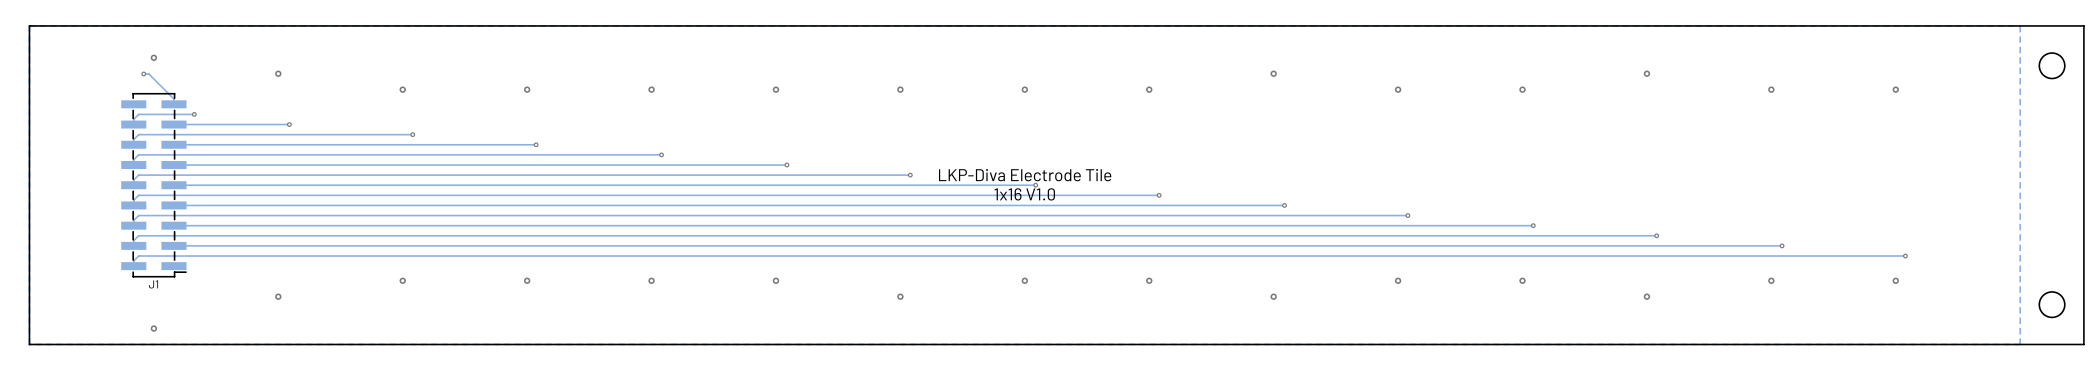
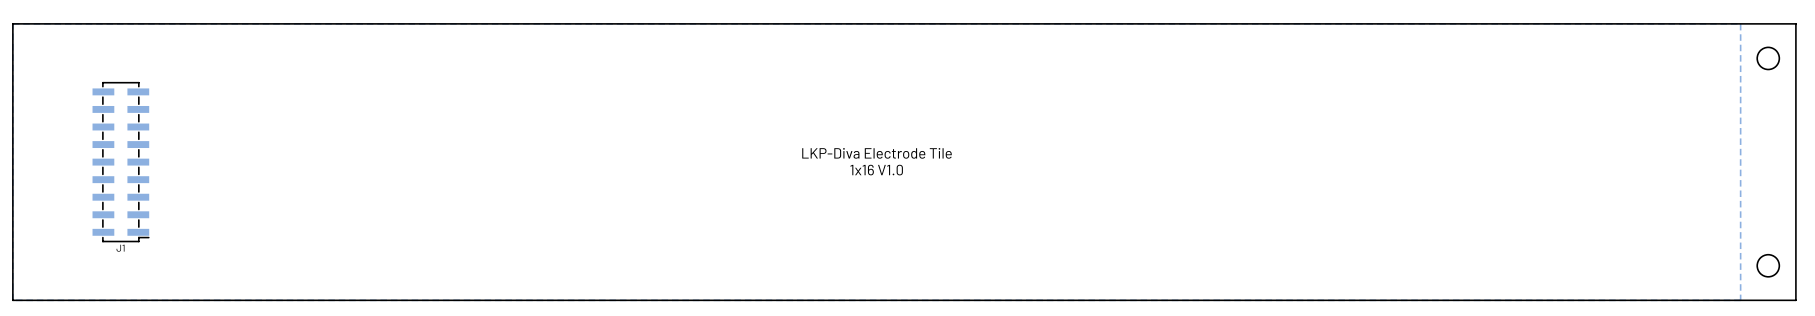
via: (153, 57) -> none
track: (143, 73) (148, 73) (173, 99) (173, 104) -> none
via: (143, 73) -> none
via: (278, 73) -> none
via: (1273, 73) -> none
via: (1646, 73) -> none
via: (402, 89) -> none
via: (527, 89) -> none
via: (651, 89) -> none
via: (775, 89) -> none
via: (900, 89) -> none
via: (1024, 89) -> none
via: (1149, 89) -> none
via: (1398, 89) -> none
via: (1522, 89) -> none
via: (1771, 89) -> none
via: (1895, 89) -> none
track: (194, 114) (138, 114) (133, 119) (133, 124) -> none
via: (194, 114) -> none
track: (289, 124) (173, 124) -> none
via: (289, 124) -> none
track: (412, 134) (138, 134) (133, 139) (133, 144) -> none
via: (412, 134) -> none
track: (536, 144) (173, 144) -> none
via: (536, 144) -> none
track: (661, 154) (138, 154) (133, 159) (133, 165) -> none
via: (661, 154) -> none
track: (786, 165) (173, 165) -> none
via: (786, 165) -> none
track: (910, 175) (138, 175) (133, 180) (133, 185) -> none
via: (910, 175) -> none
track: (1035, 185) (173, 185) -> none
via: (1035, 185) -> none
track: (1159, 195) (138, 195) (133, 200) (133, 205) -> none
via: (1159, 195) -> none
track: (1284, 205) (173, 205) -> none
via: (1284, 205) -> none
track: (1407, 215) (138, 215) (133, 220) (133, 225) -> none
via: (1407, 215) -> none
track: (1533, 225) (173, 225) -> none
via: (1533, 225) -> none
track: (1656, 235) (138, 235) (133, 240) (133, 245) -> none
via: (1656, 235) -> none
track: (1782, 245) (173, 245) -> none
via: (1782, 245) -> none
track: (1905, 256) (138, 256) (133, 260) (133, 266) -> none
via: (1905, 256) -> none
via: (402, 280) -> none
via: (527, 280) -> none
via: (651, 280) -> none
via: (775, 280) -> none
via: (1024, 280) -> none
via: (1149, 280) -> none
via: (1398, 280) -> none
via: (1522, 280) -> none
via: (1771, 280) -> none
via: (1895, 280) -> none
via: (278, 296) -> none
via: (900, 296) -> none
via: (1273, 296) -> none
via: (1646, 296) -> none
via: (153, 328) -> none

